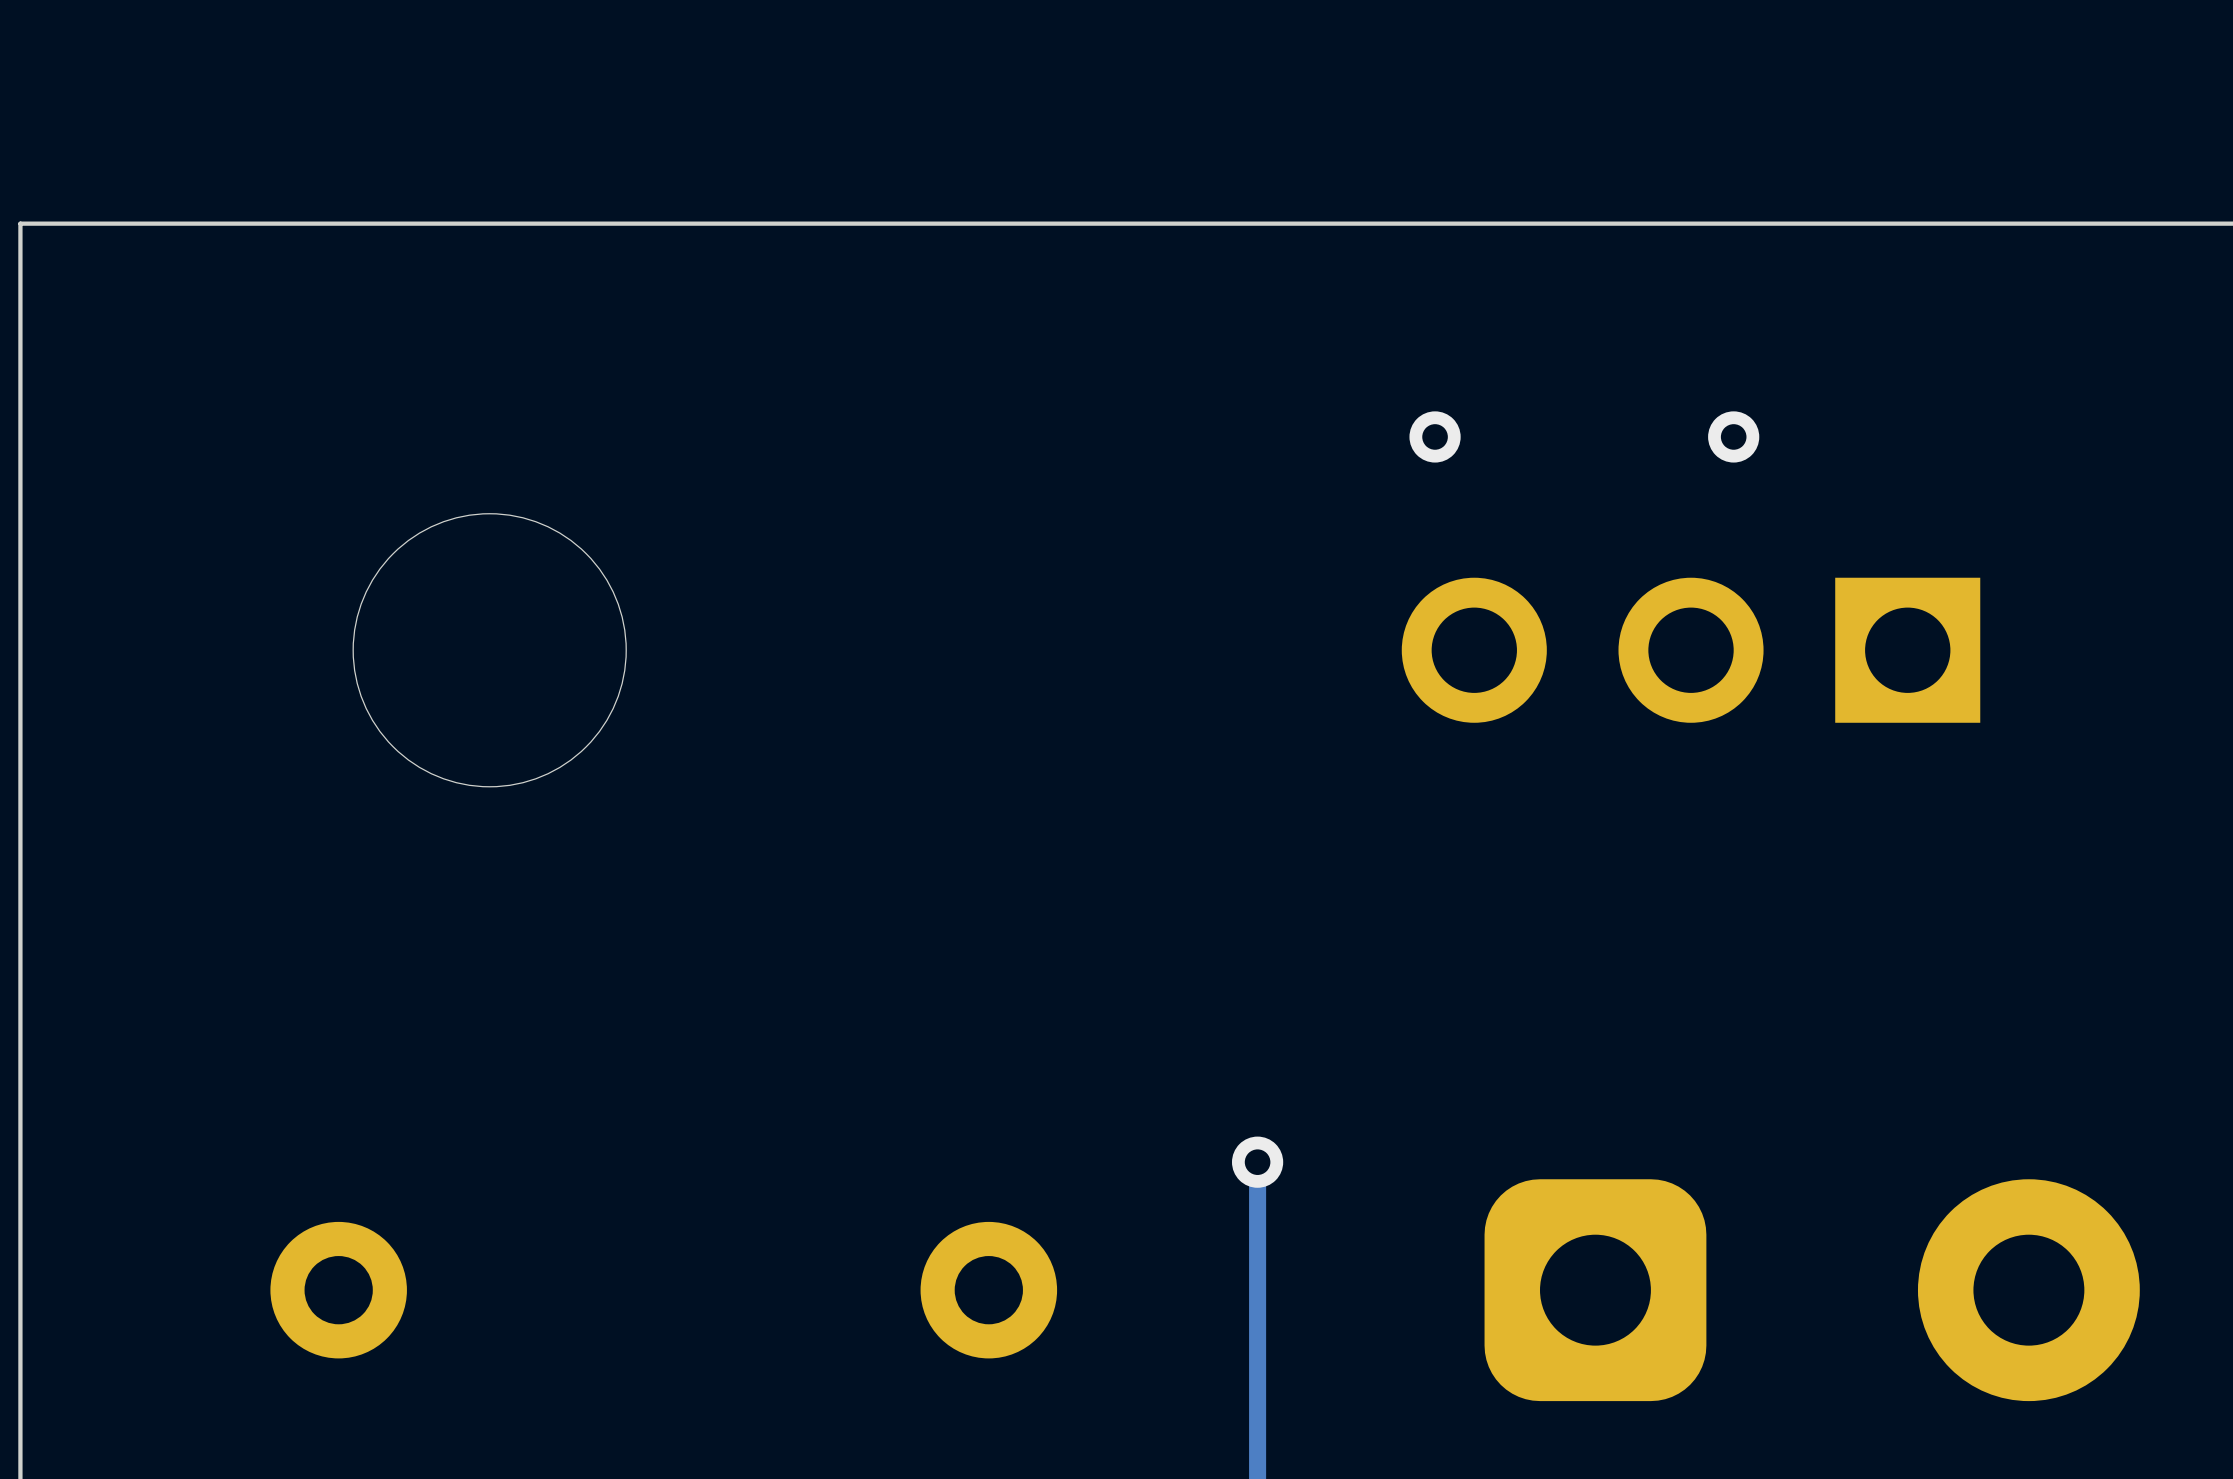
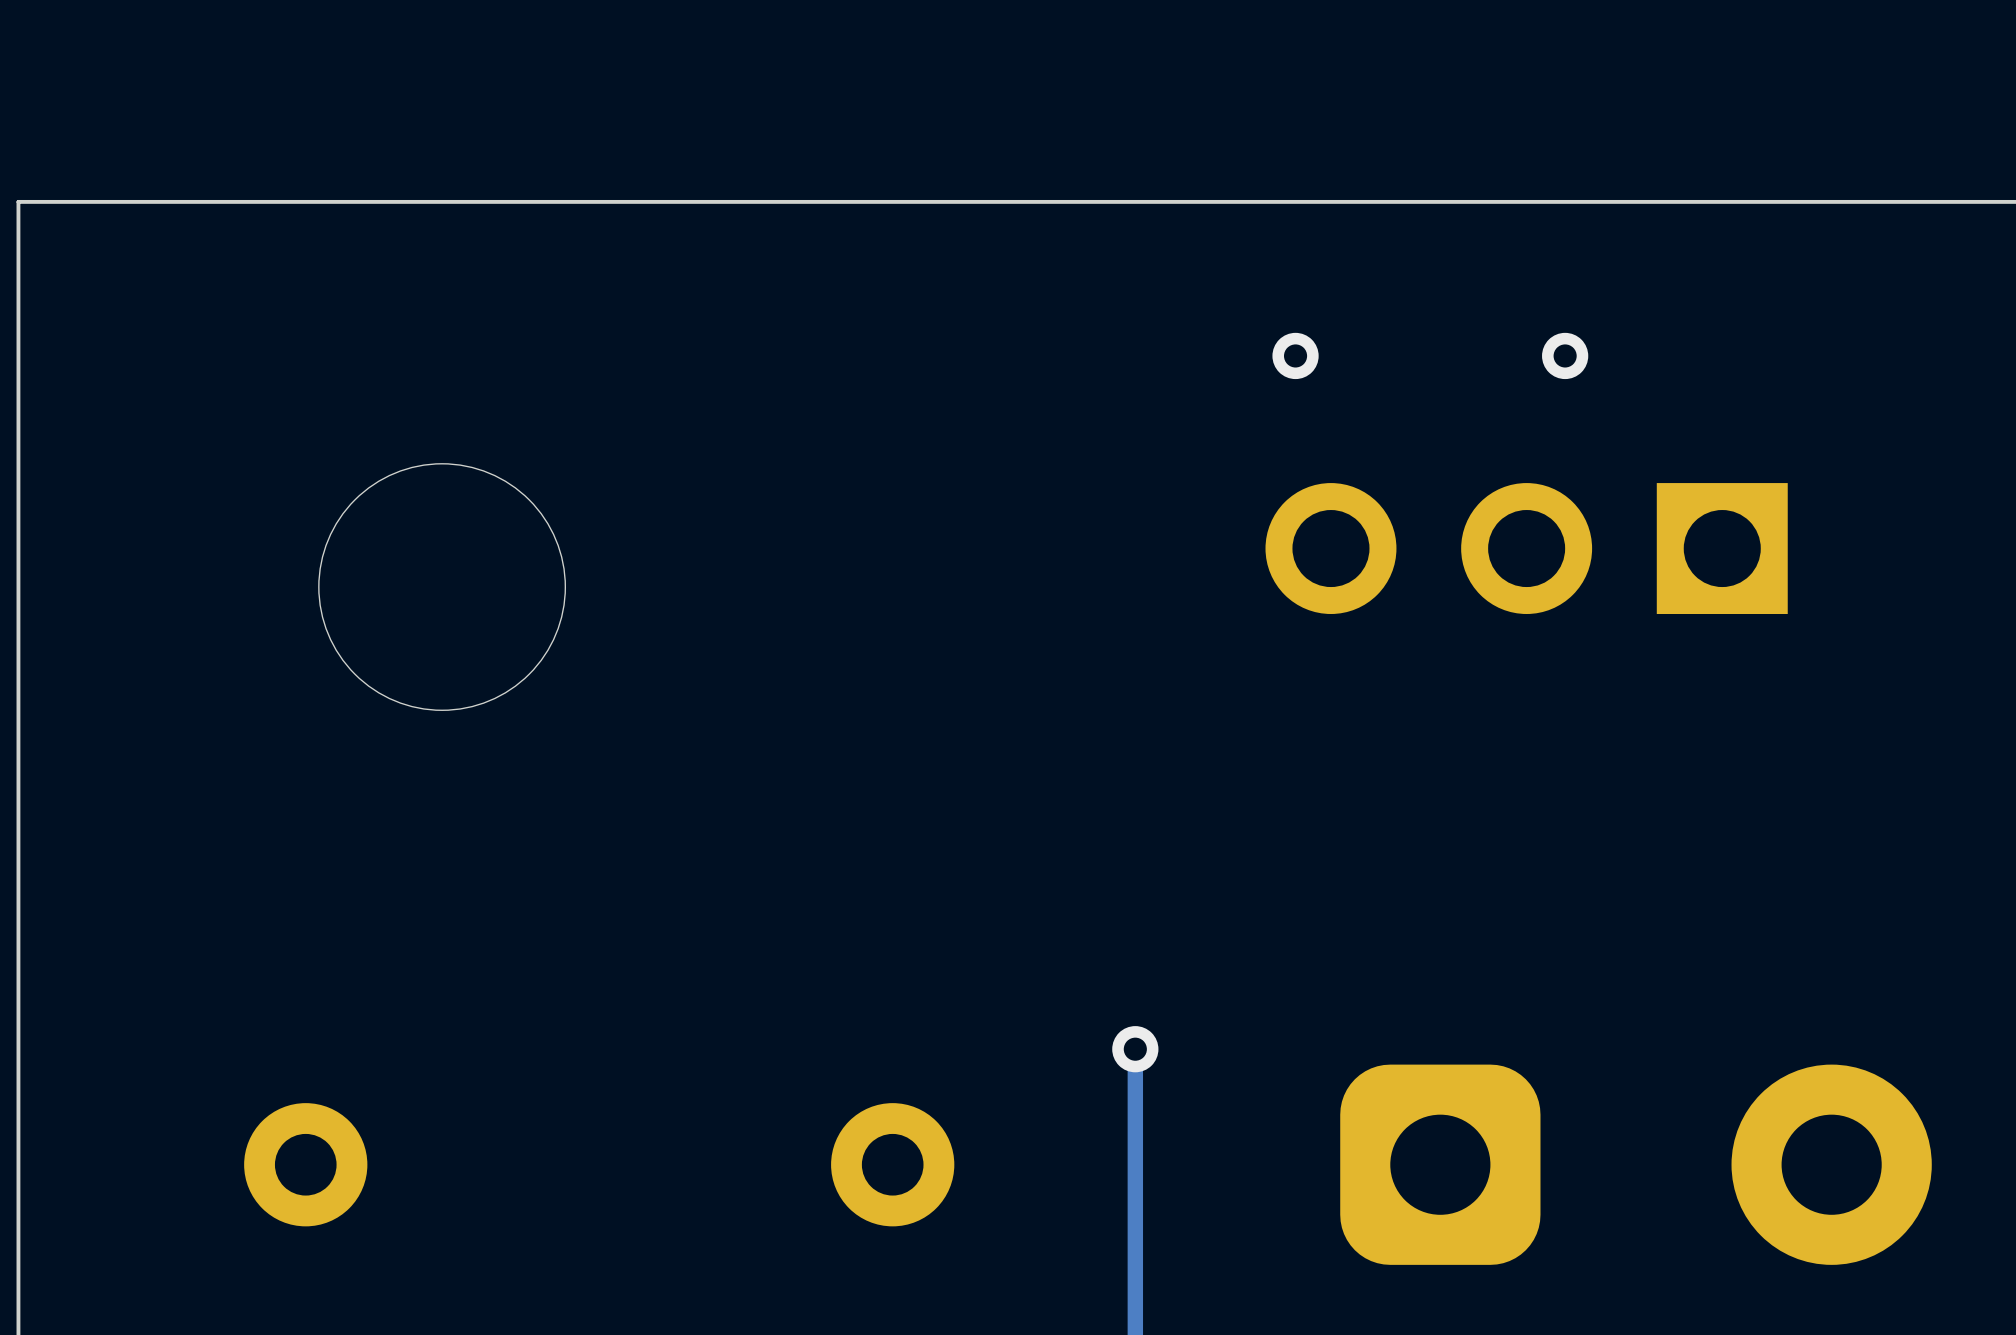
via position: (1435, 436) -> (1295, 355)
via position: (1733, 436) -> (1565, 355)
part position: (1691, 650) -> (1526, 548)

